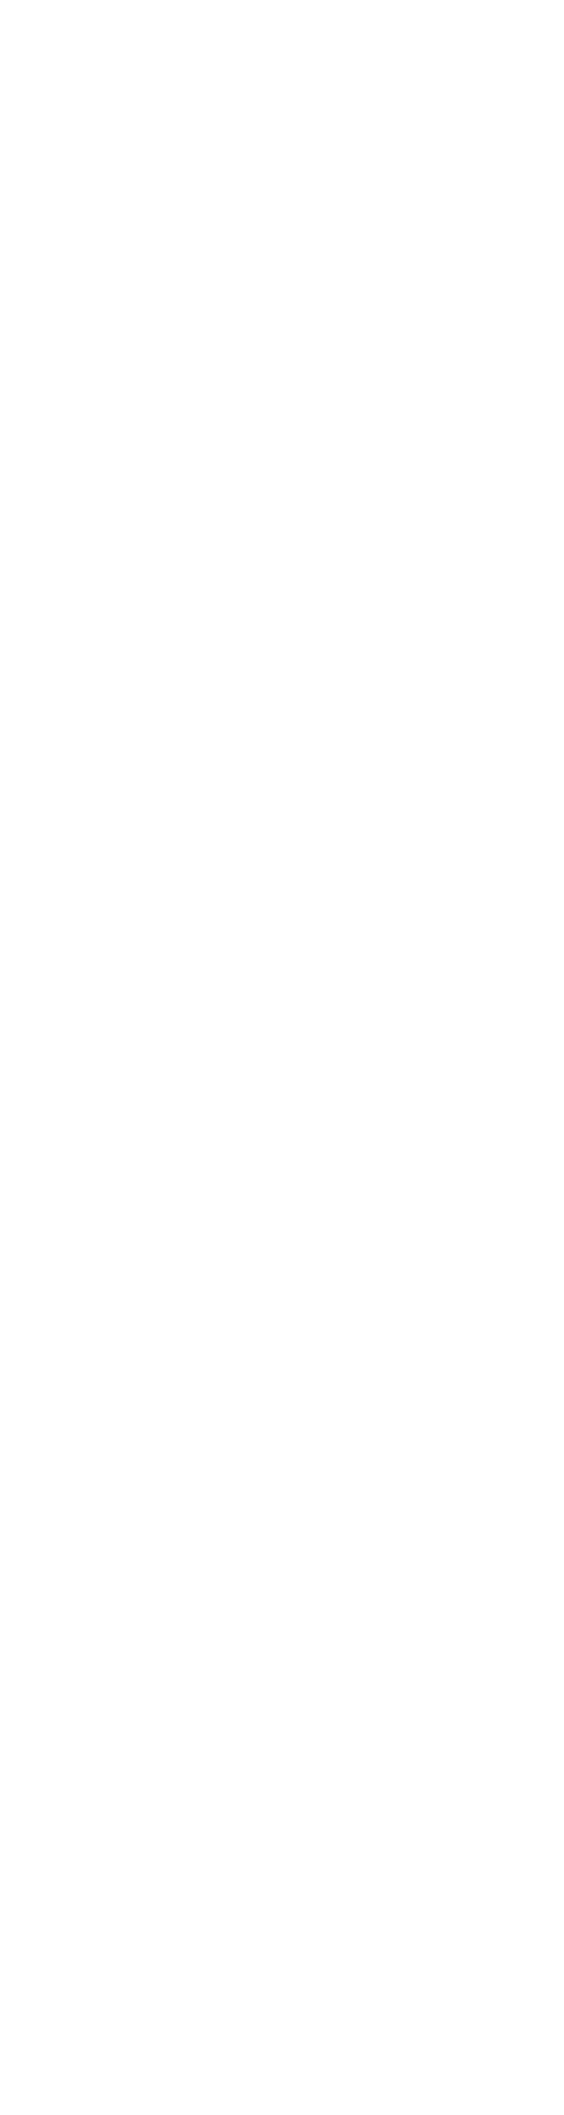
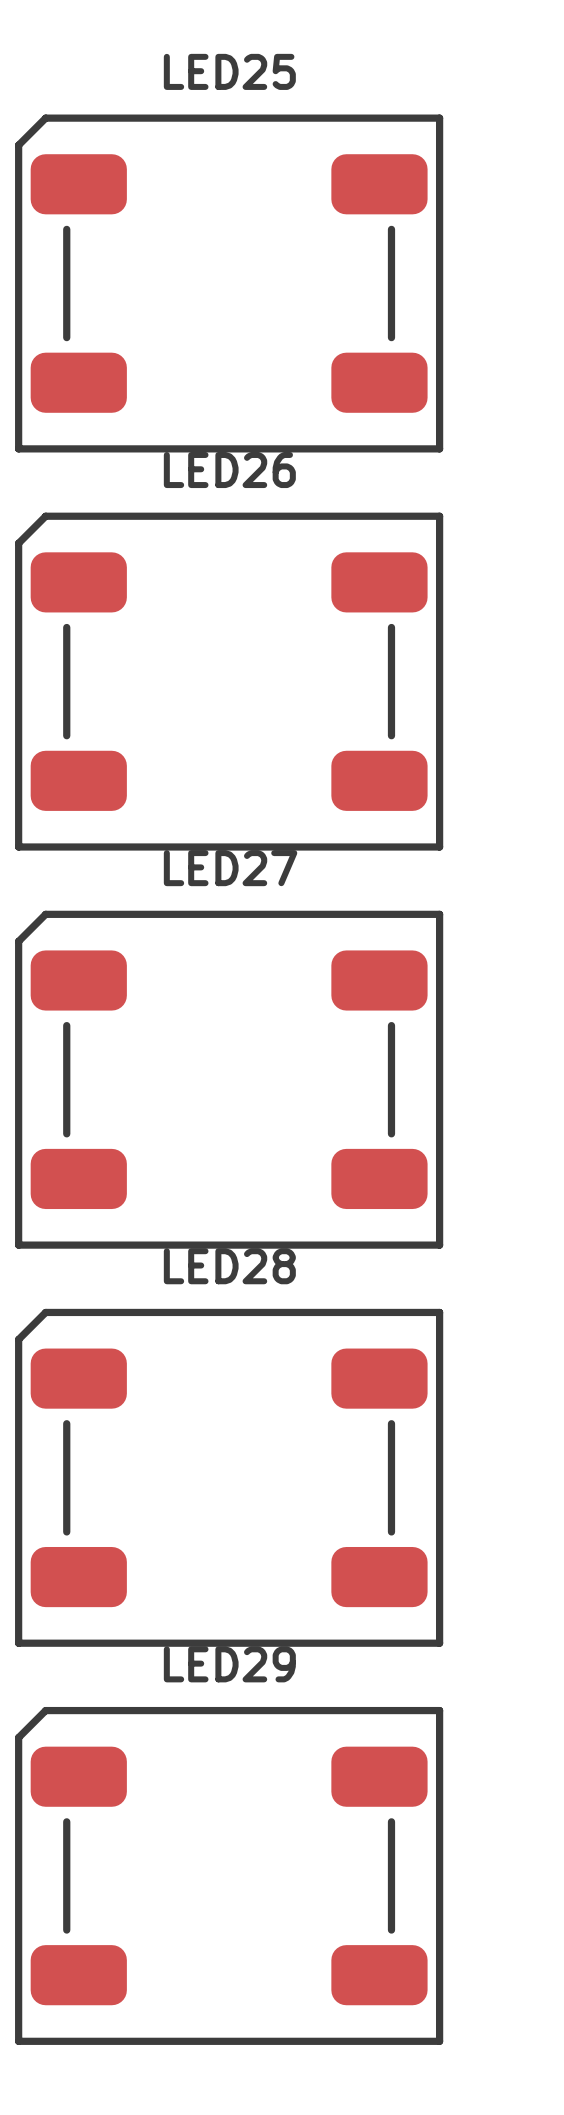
LED25: none -> (229, 283)
LED26: none -> (229, 681)
LED27: none -> (229, 1079)
LED28: none -> (229, 1477)
LED29: none -> (229, 1875)

